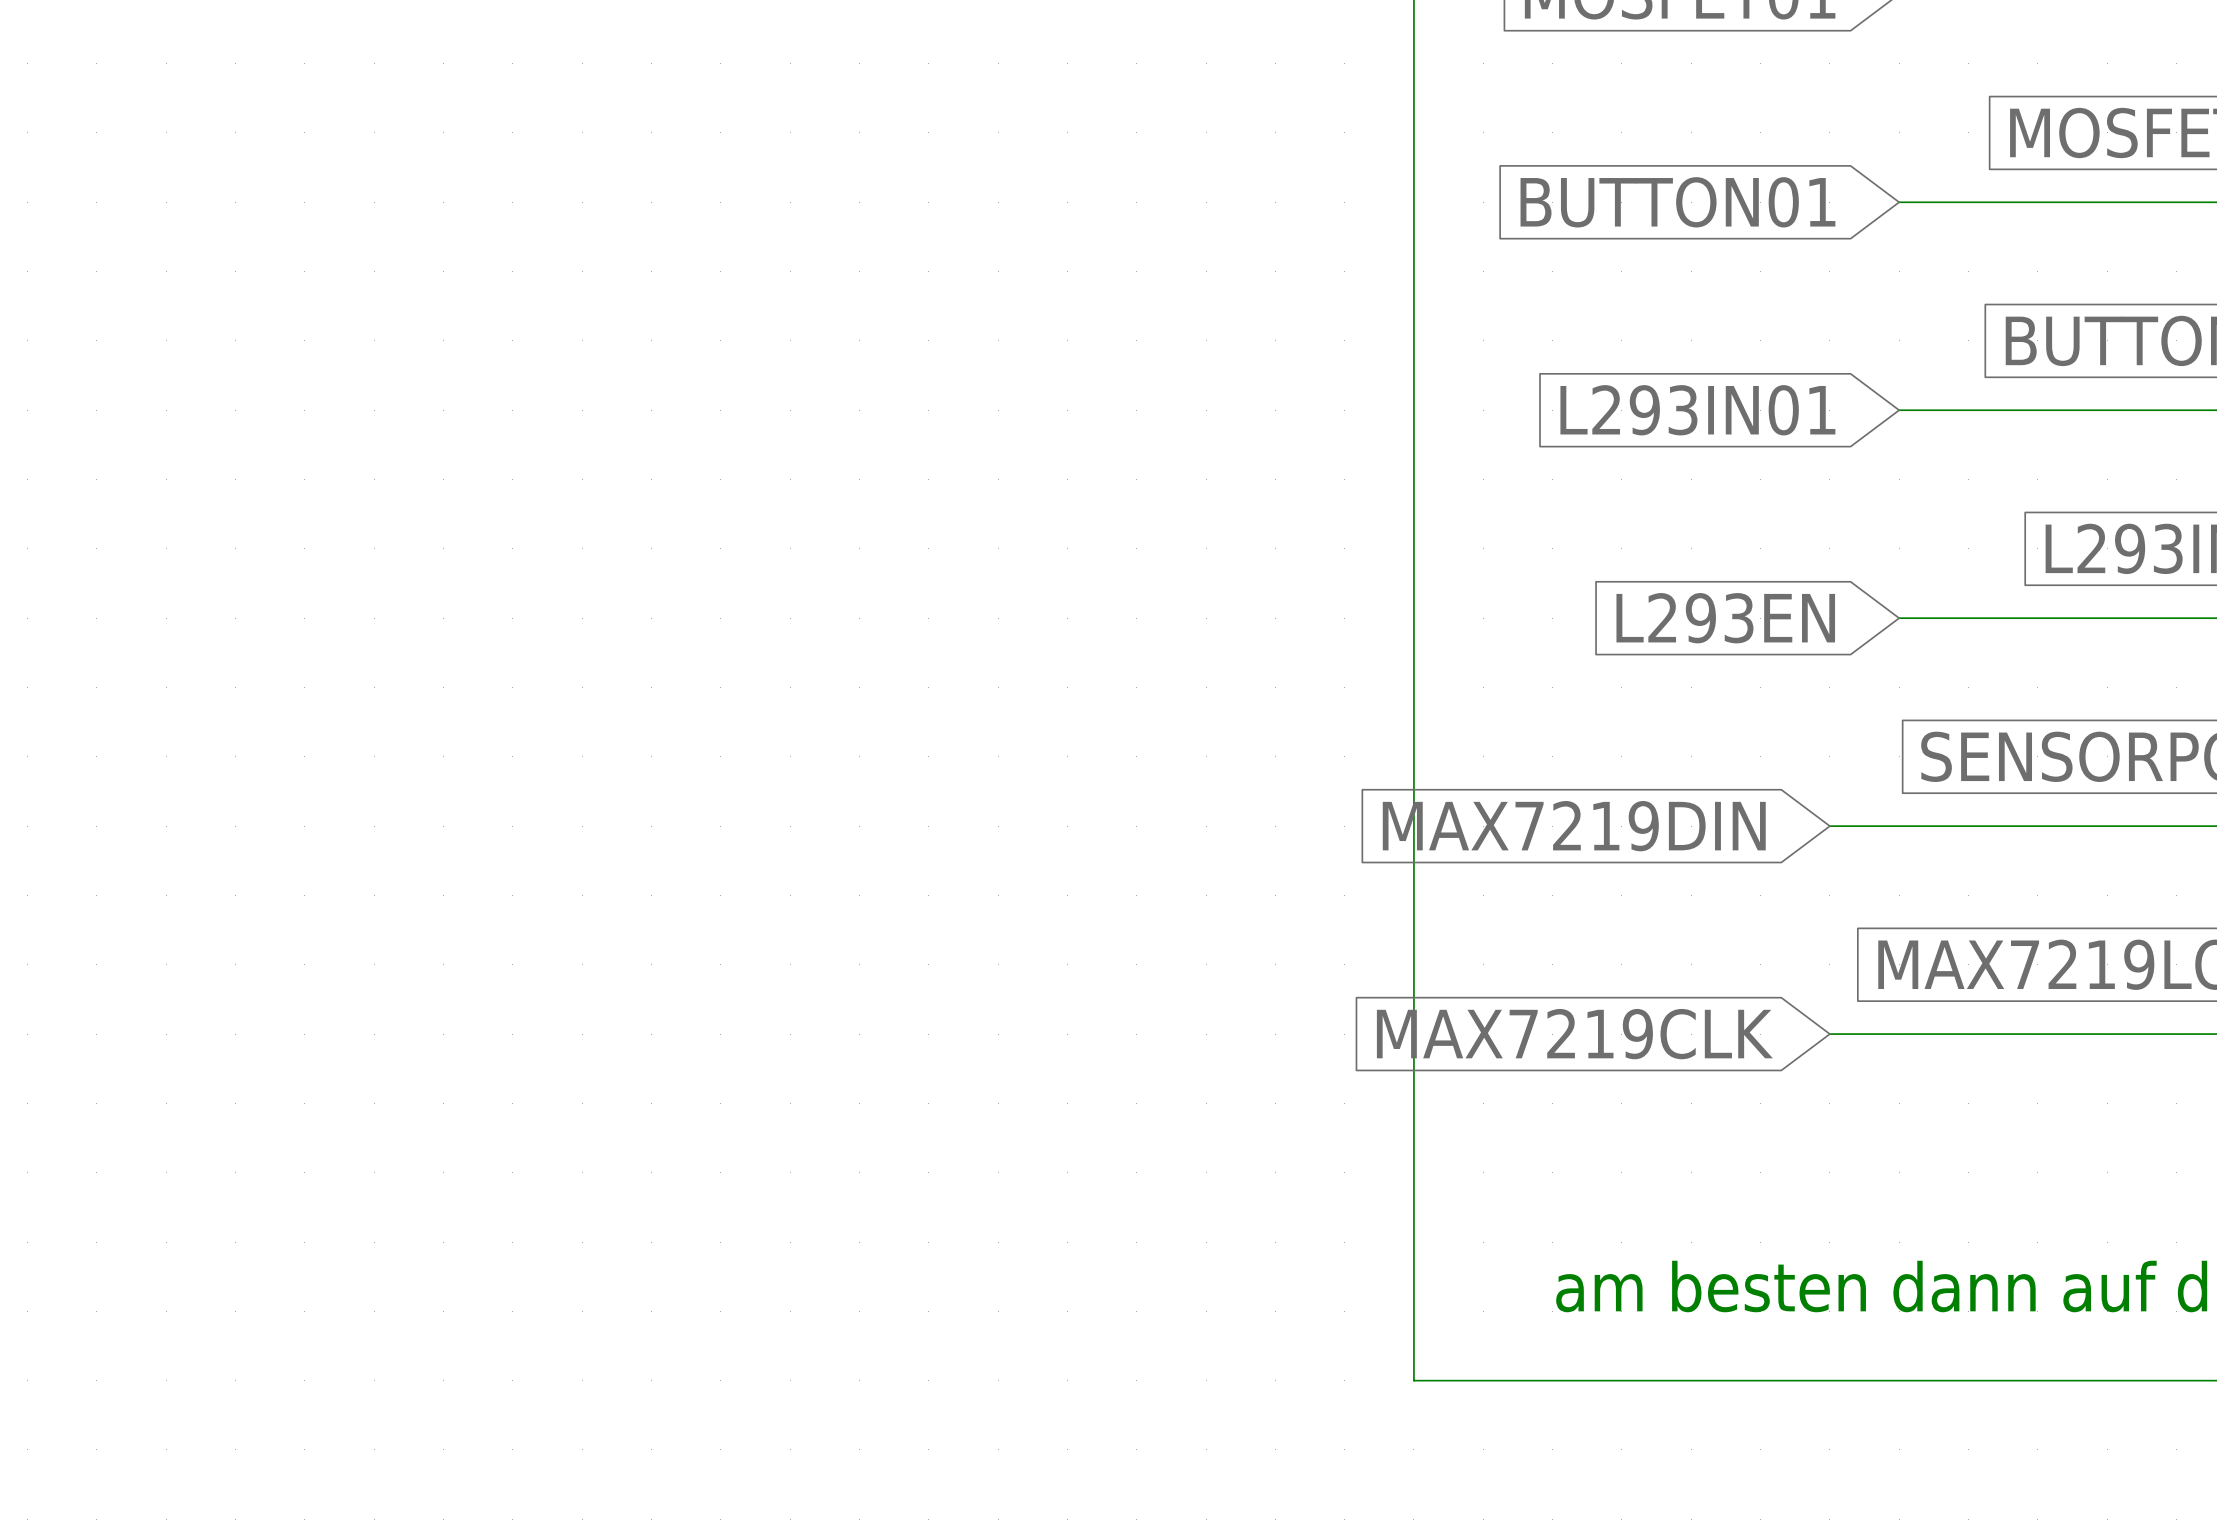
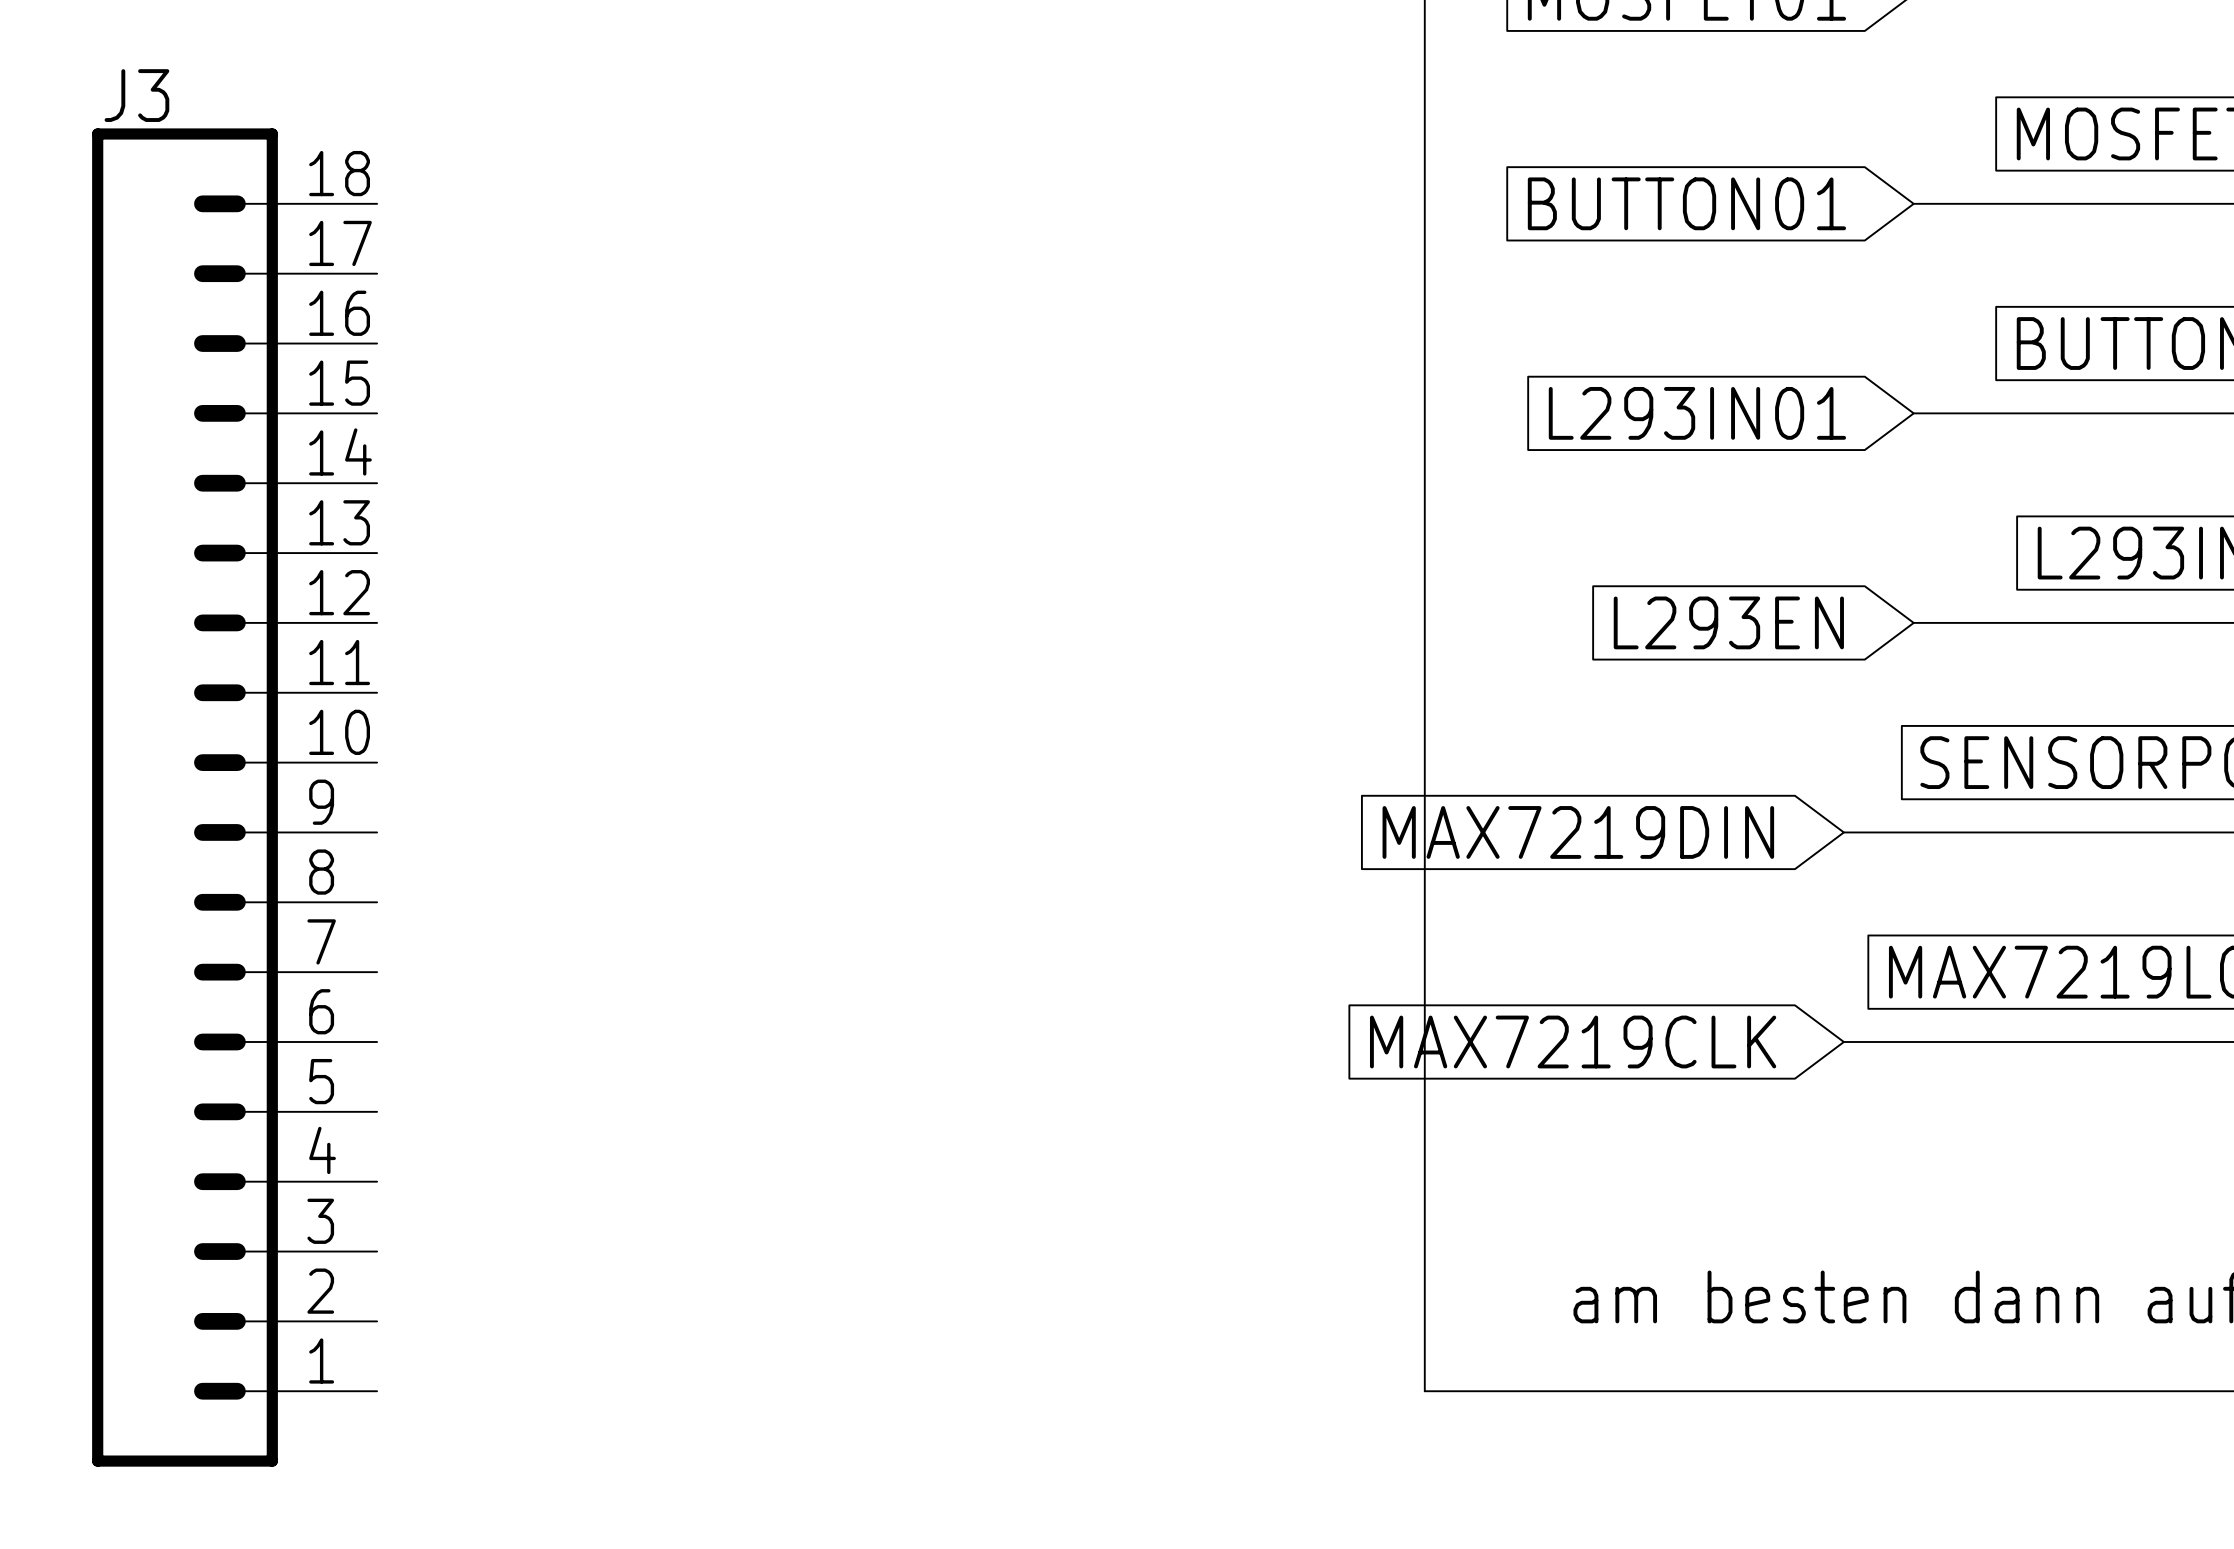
J3: none -> (234, 797)

